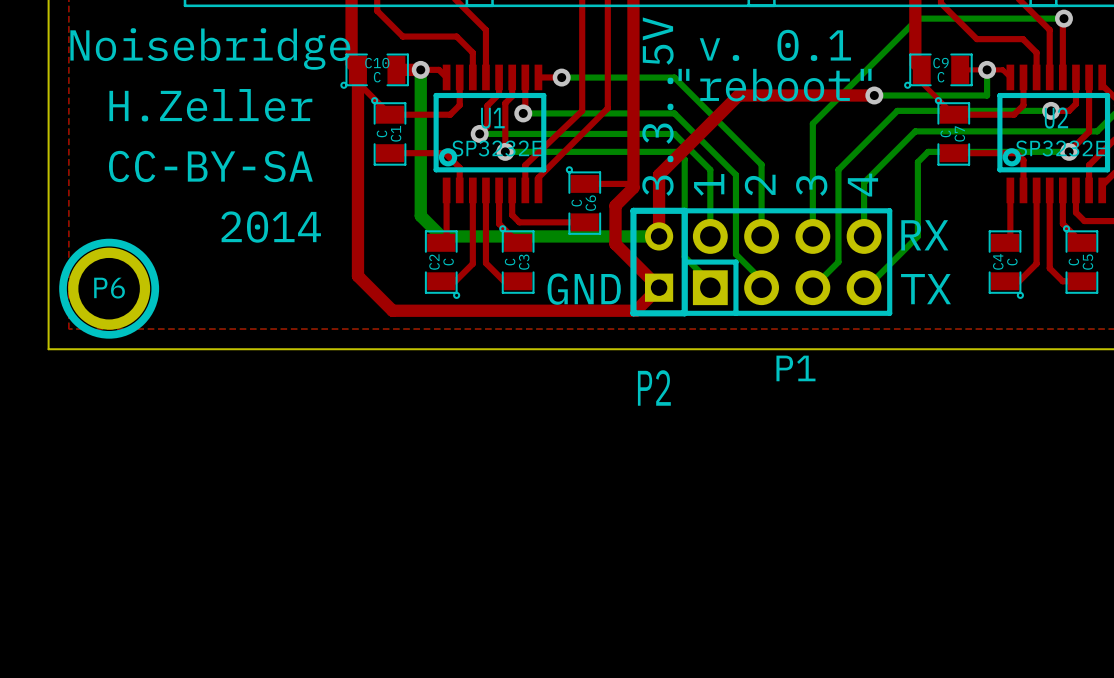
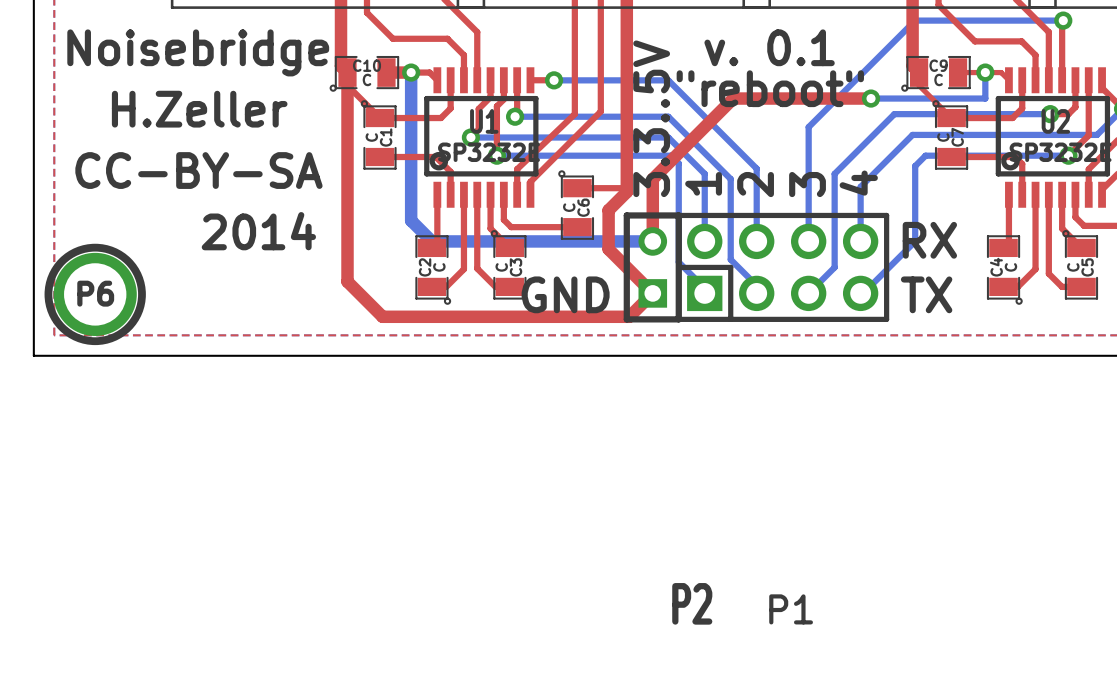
P1 name position: P1 (795, 368) -> P1 (791, 609)
P2 name position: P2 (654, 387) -> P2 (692, 603)

